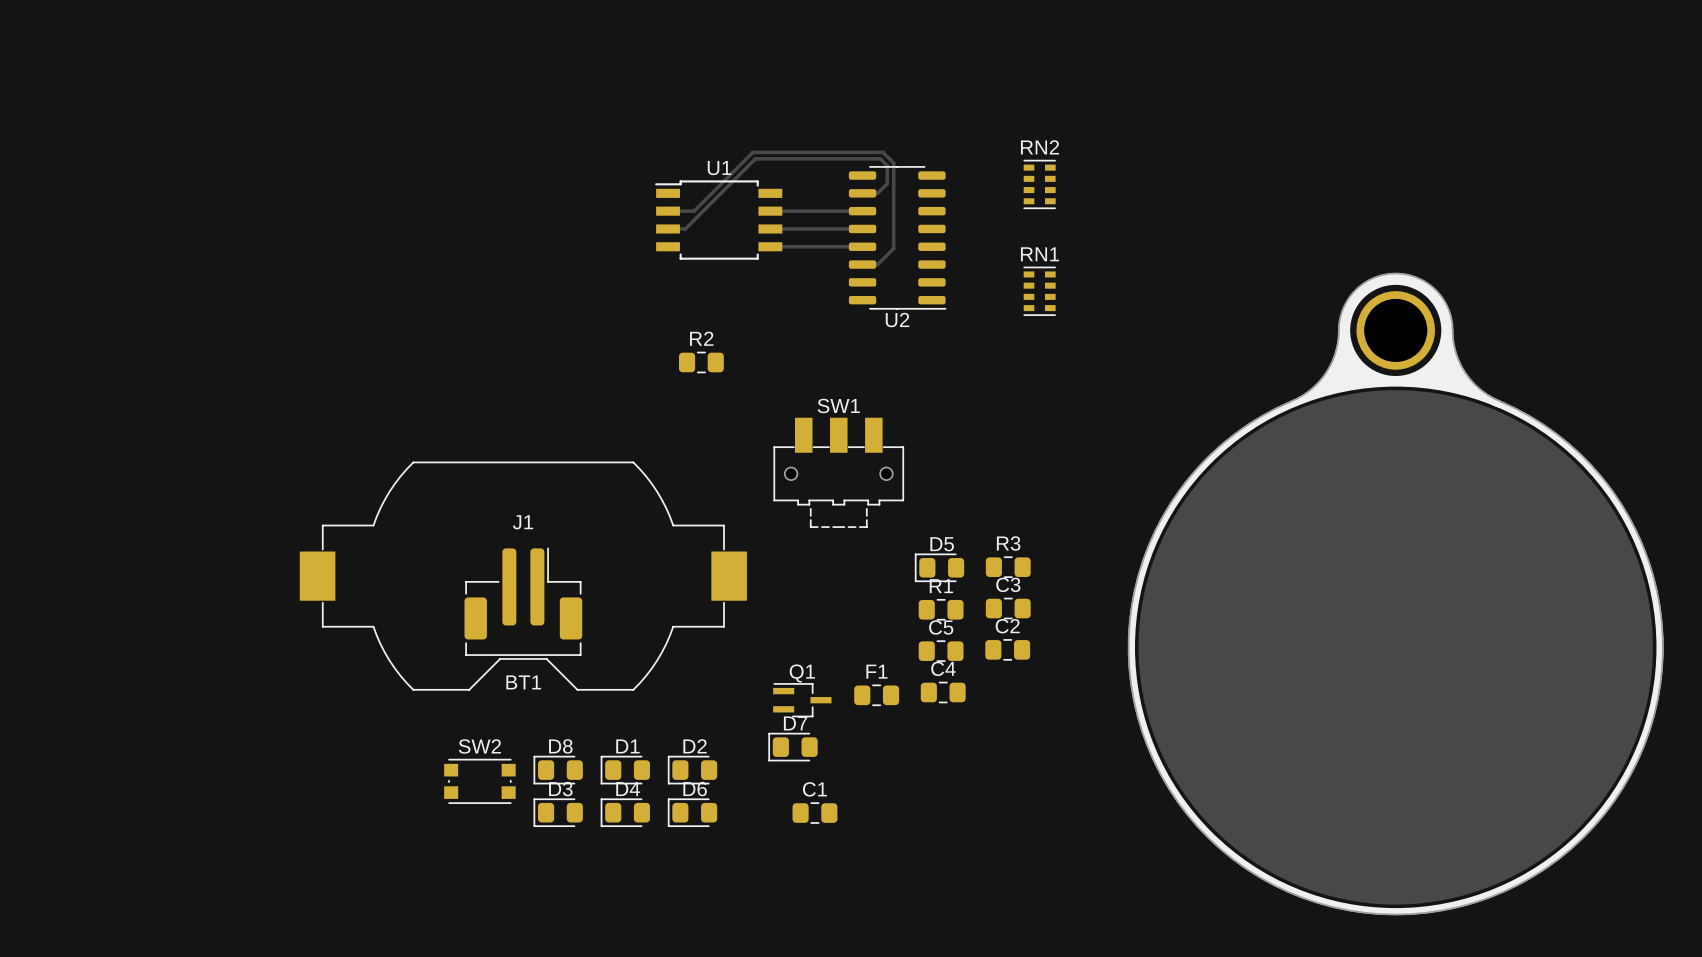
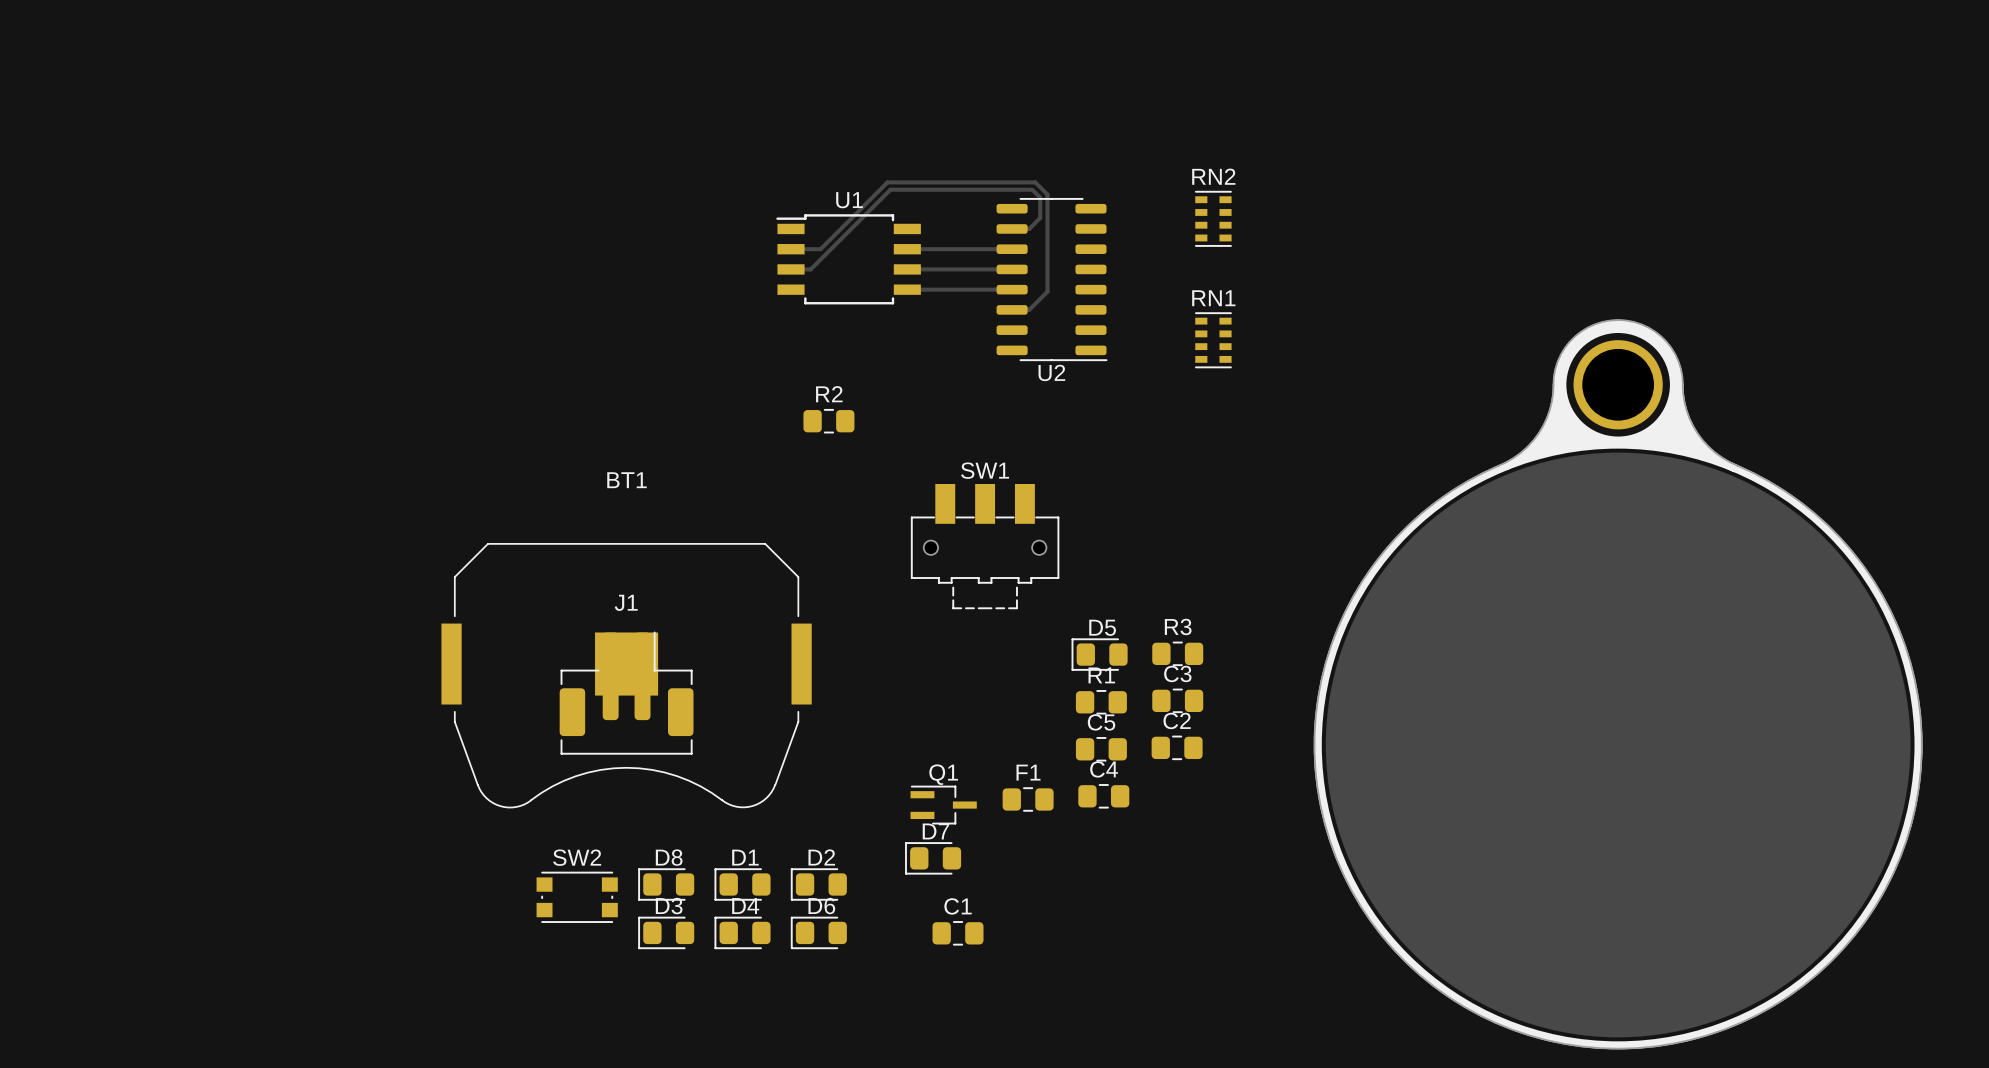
BT1 footprint: [299, 461, 747, 691] -> [441, 543, 812, 809]
BT1 name position: BT1 (523, 682) -> BT1 (626, 480)

